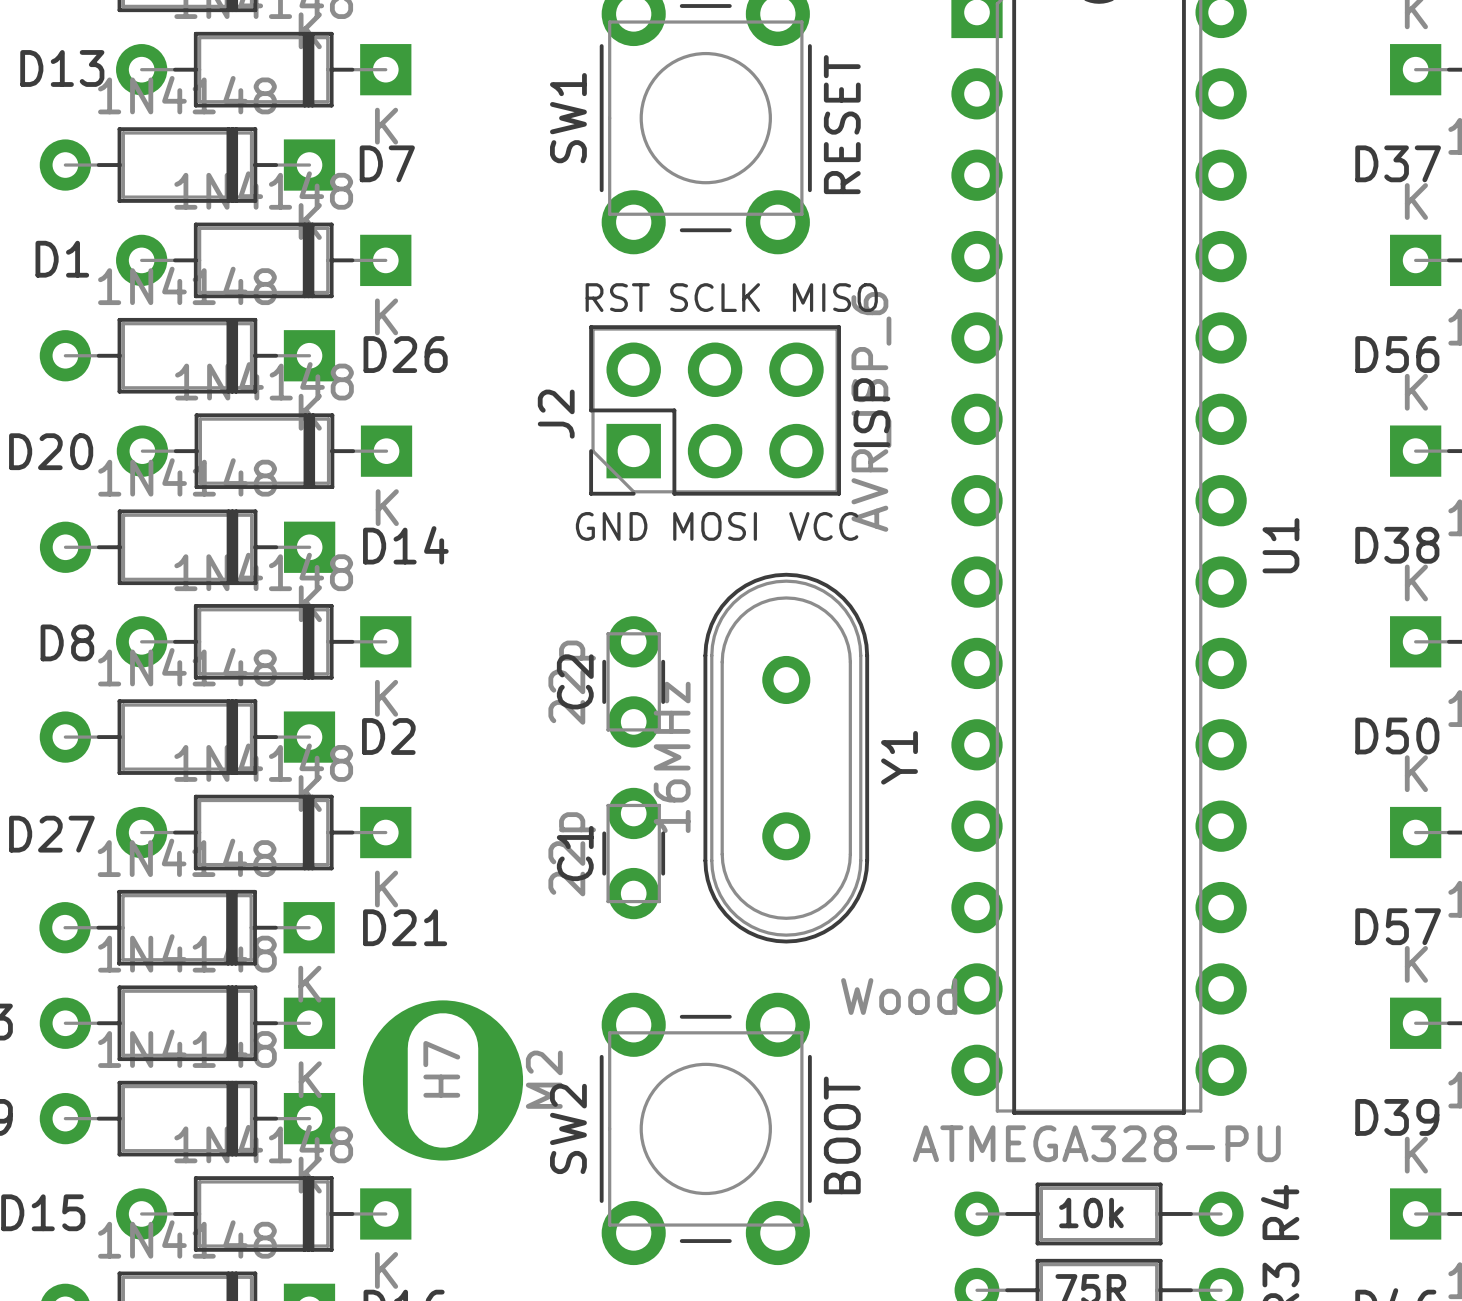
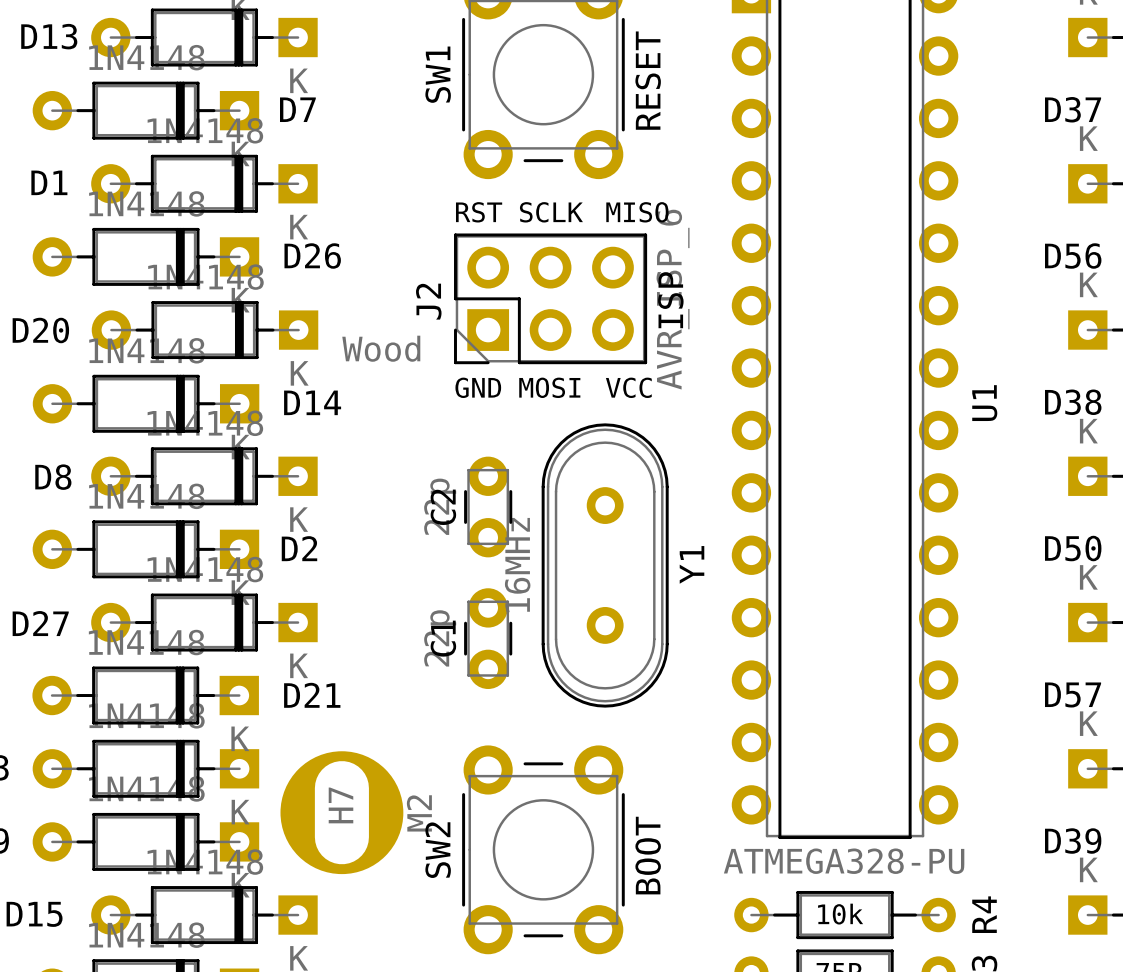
drawing position: (899, 996) -> (381, 348)

